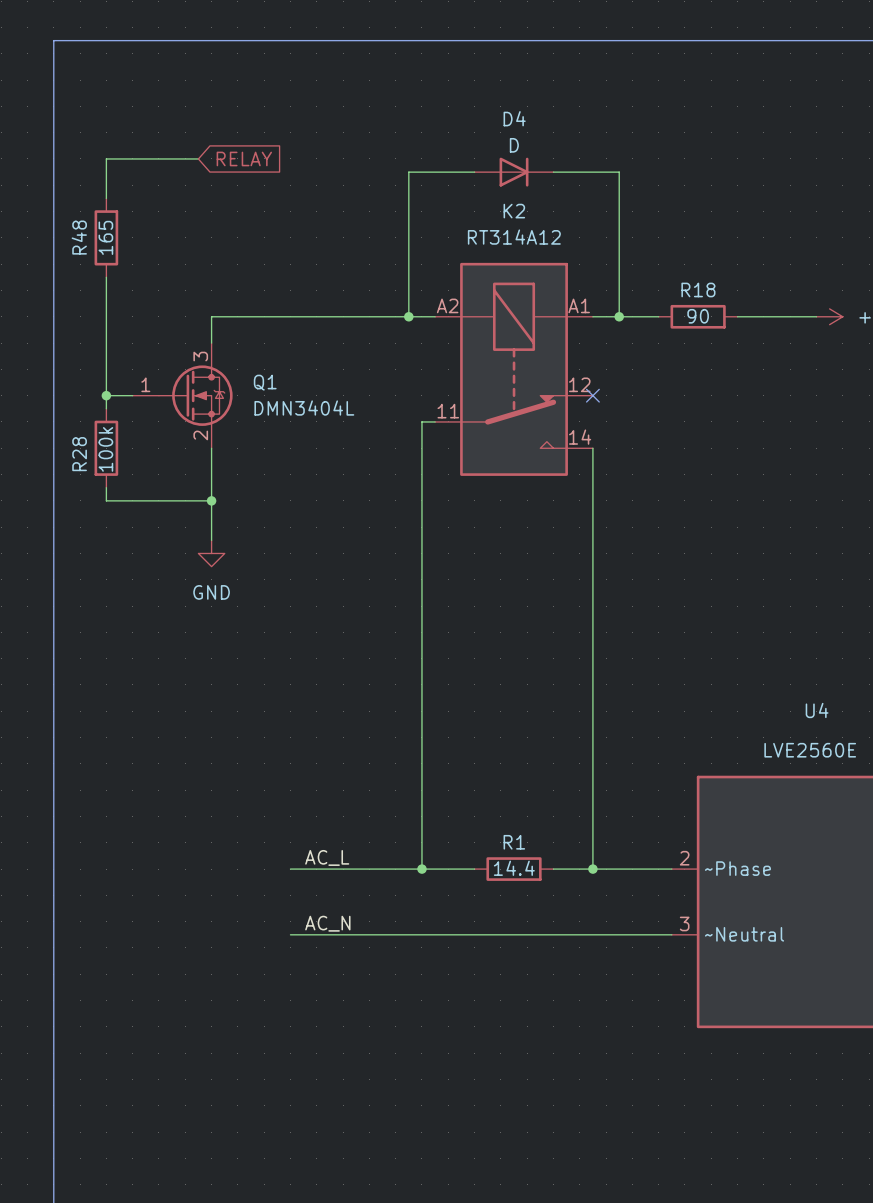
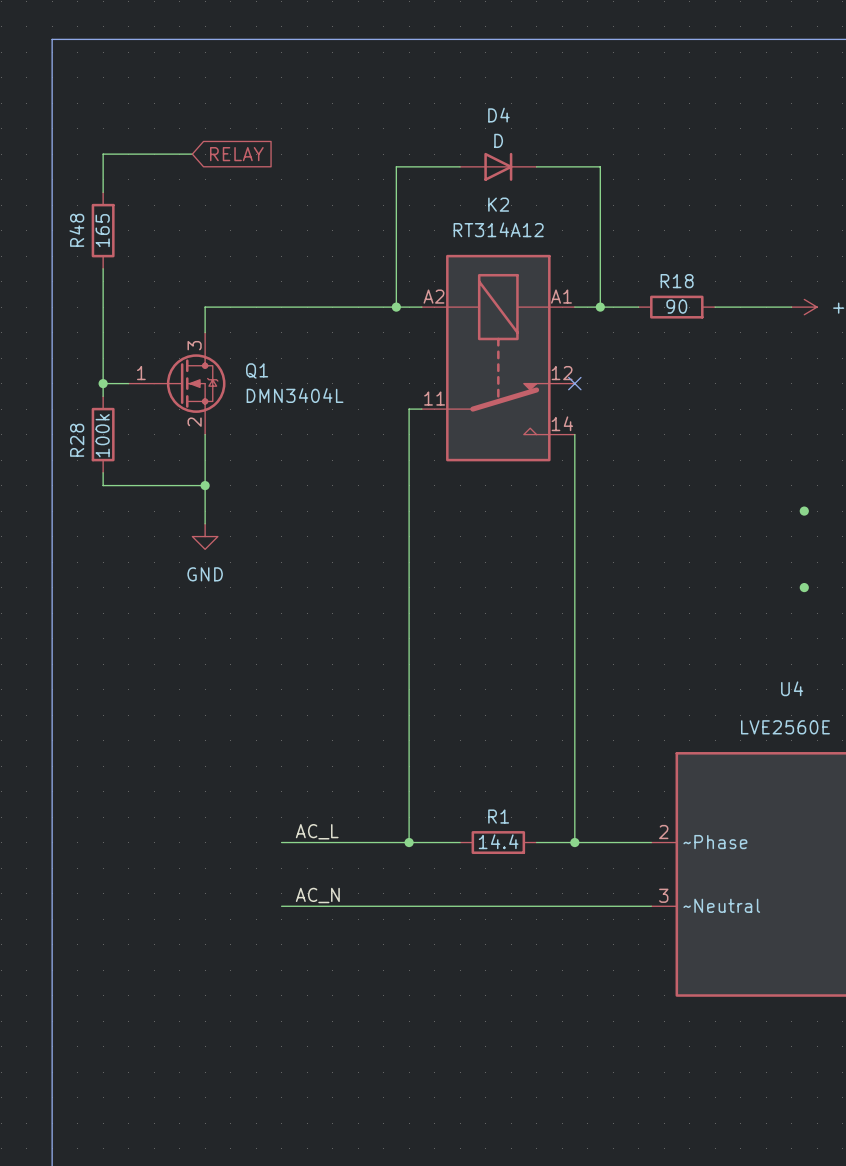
junction: none -> (804, 511)
junction: none -> (804, 587)

